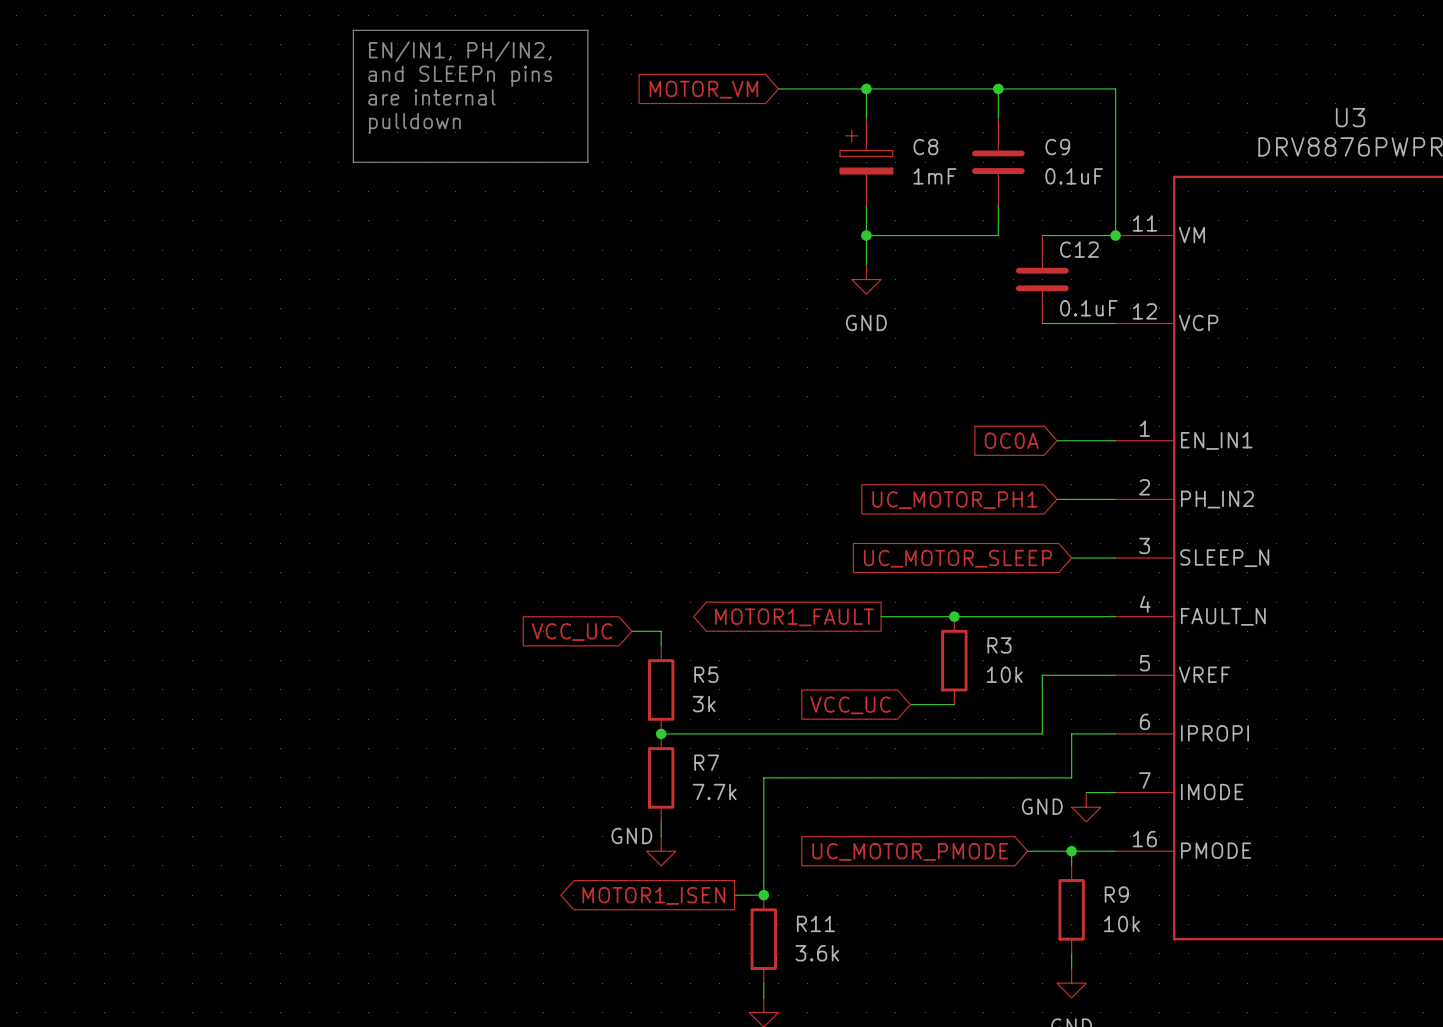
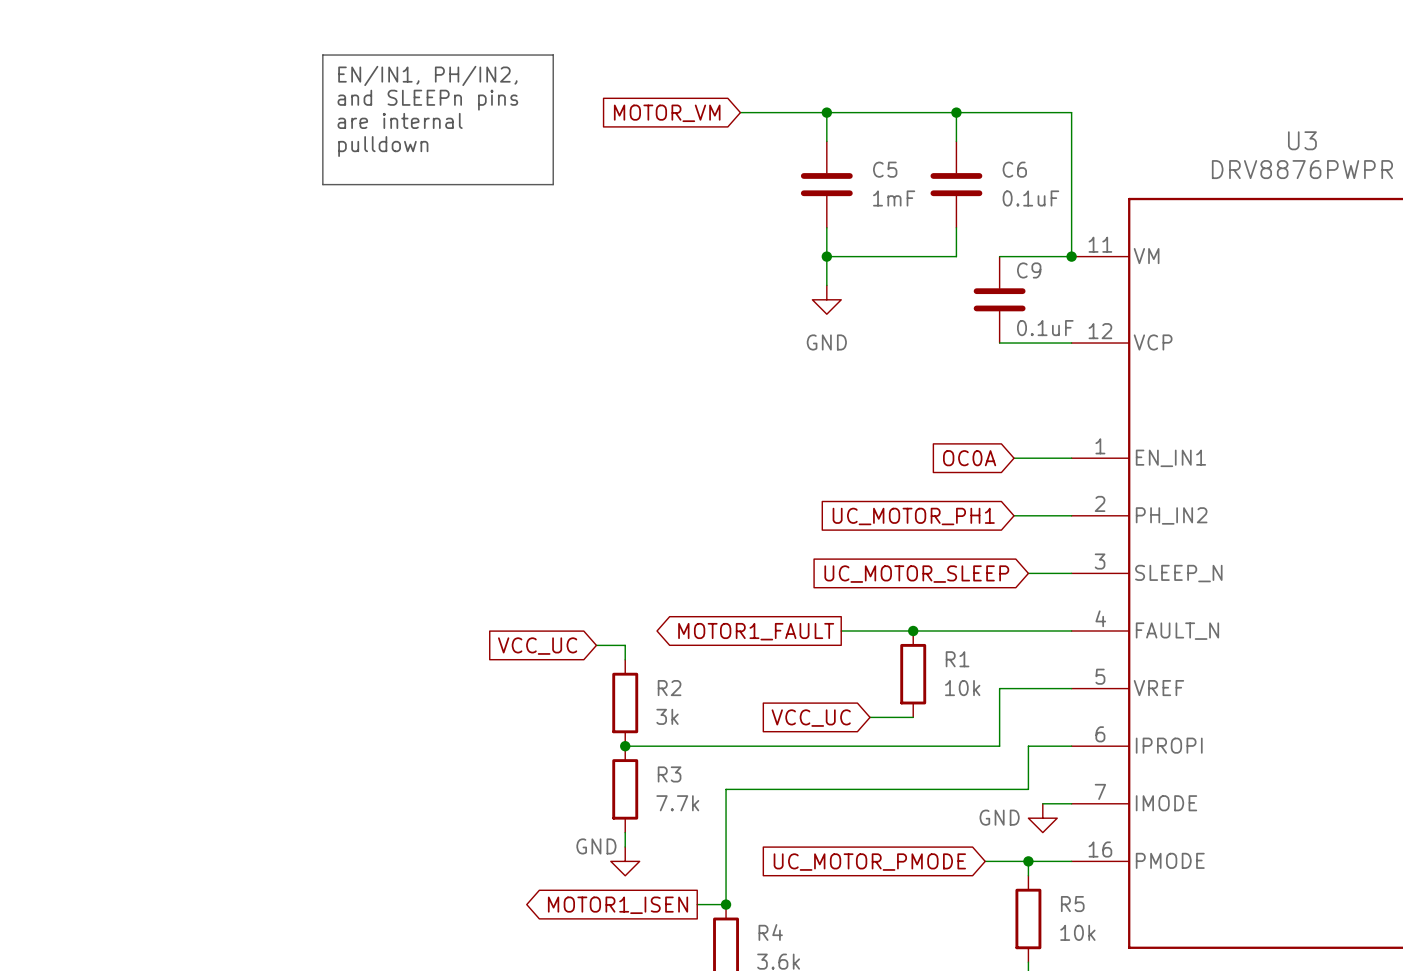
C9 name: C9 (1057, 147) -> C6 (1014, 169)
C8: 1mF (866, 162) -> none
C5: none -> 1mF (826, 184)
C12 name: C12 (1079, 249) -> C9 (1029, 270)
R3 name: R3 (999, 645) -> R1 (957, 659)
R5 name: R5 (706, 674) -> R2 (669, 688)
R7 name: R7 (706, 762) -> R3 (669, 774)
R9 name: R9 (1116, 894) -> R5 (1072, 904)
R11 name: R11 (815, 923) -> R4 (770, 932)

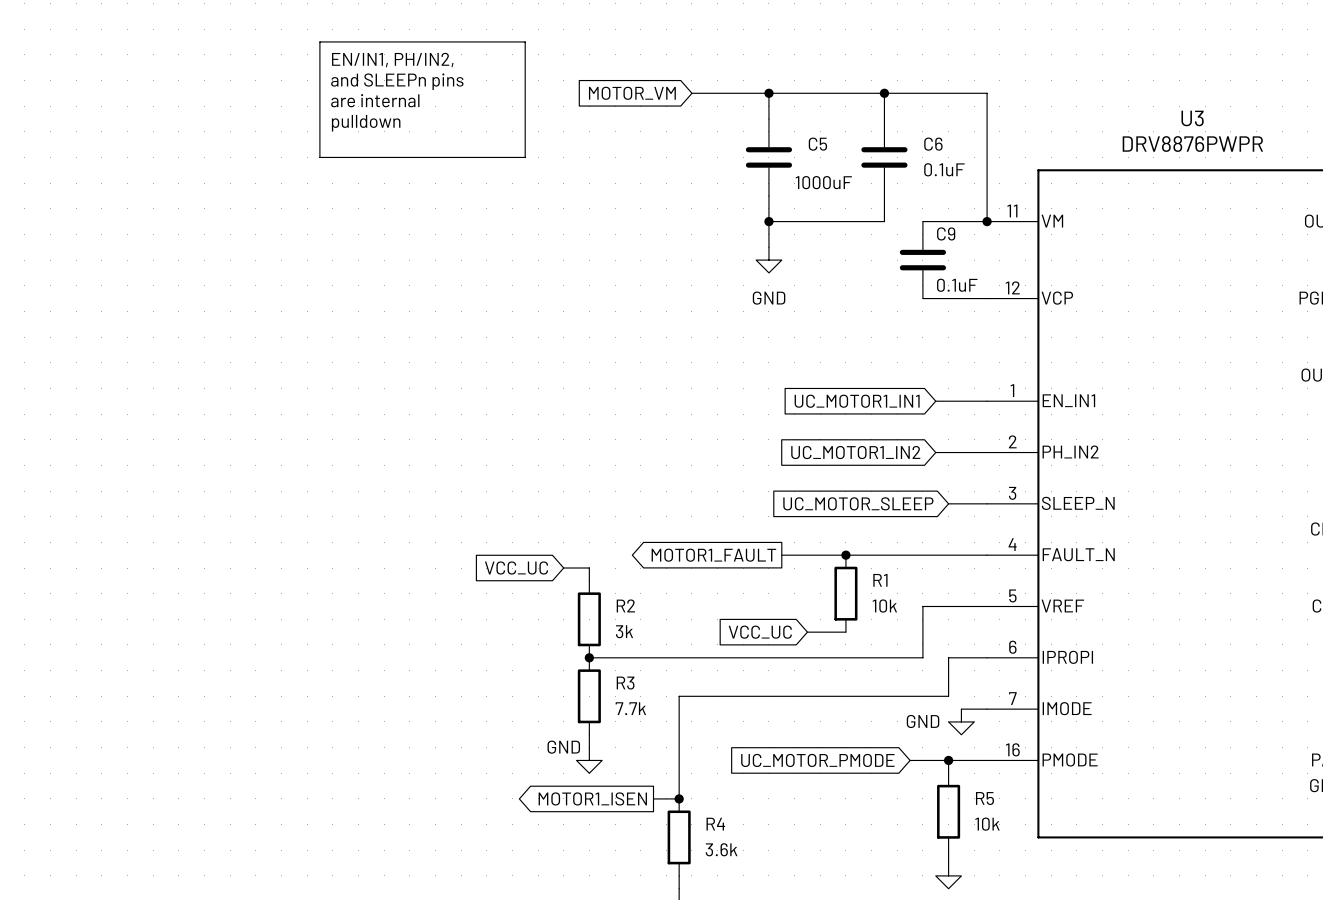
C5 value: 1mF (894, 198) -> 1000uF (823, 182)
global label: OC0A (969, 458) -> UC_MOTOR1_IN1 (857, 401)
global label: UC_MOTOR_PH1 (913, 516) -> UC_MOTOR1_IN2 (855, 452)

